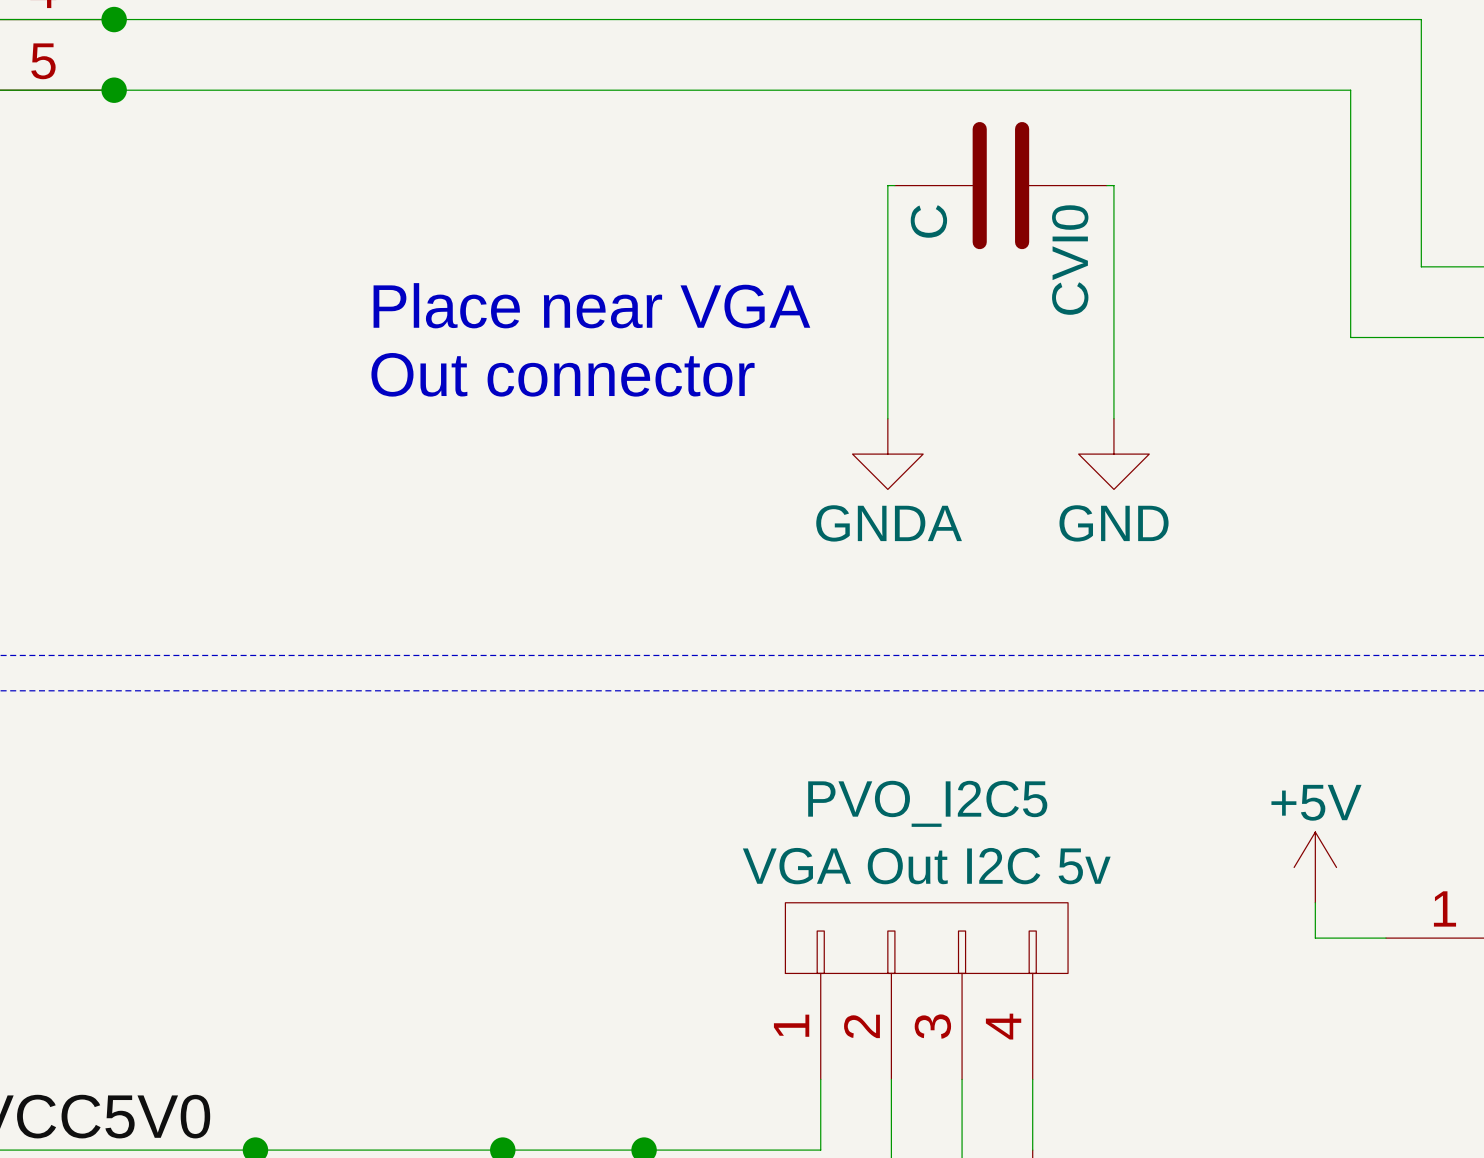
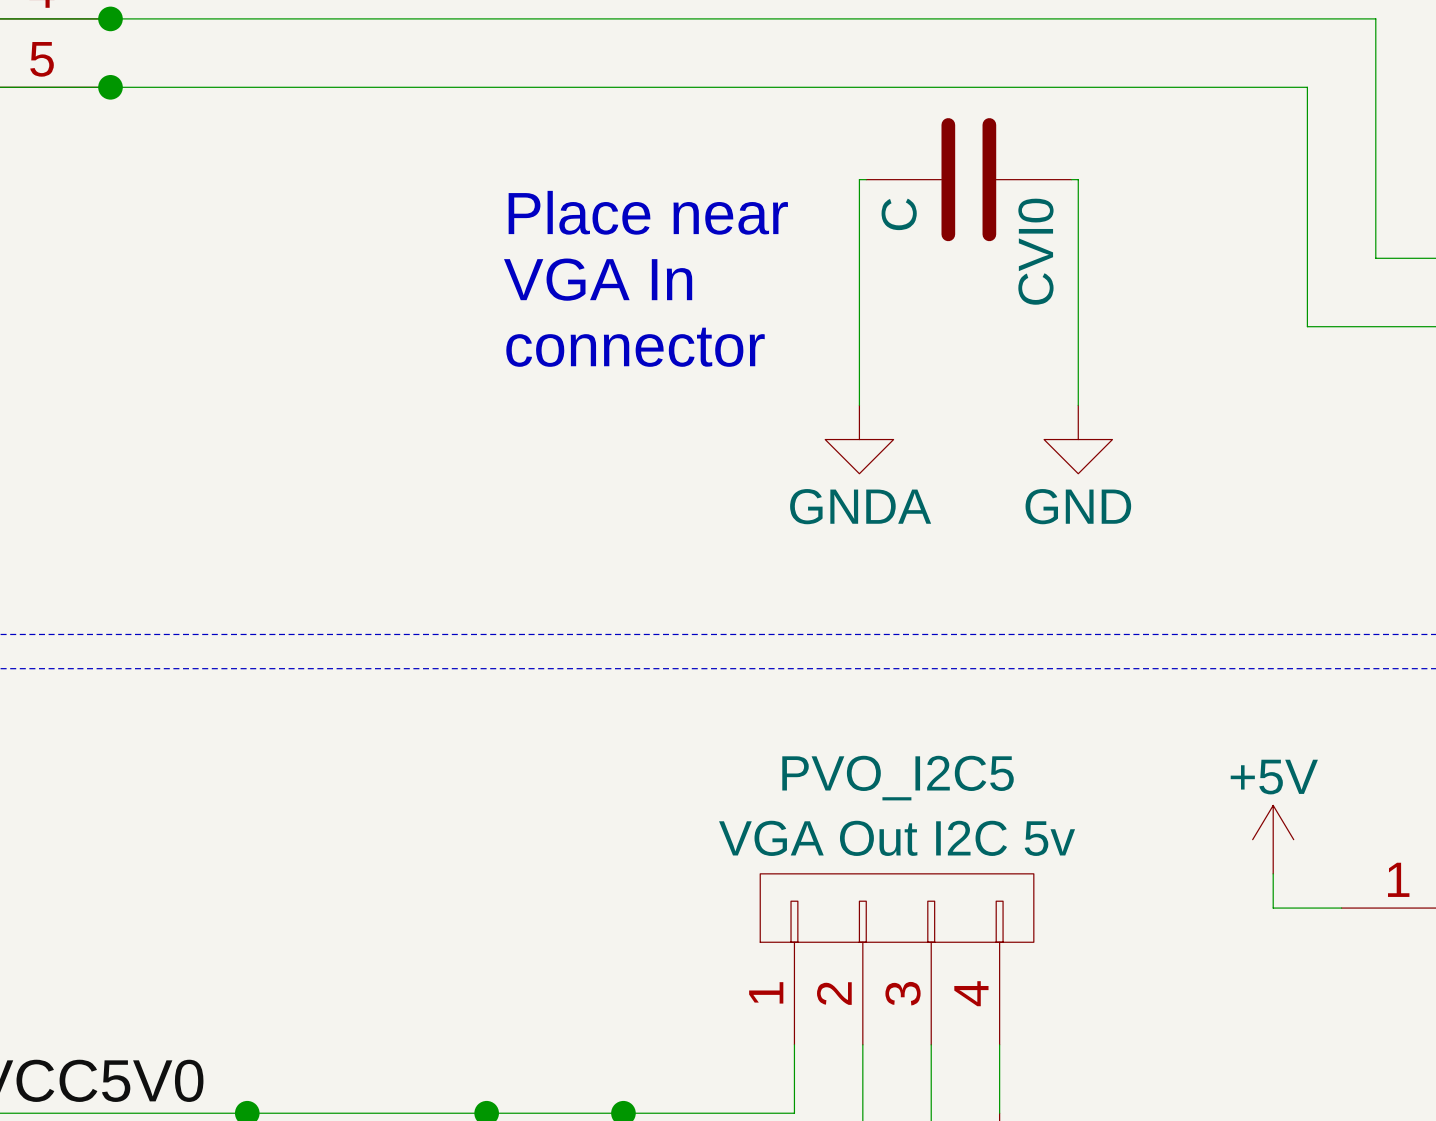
text: none -> VGA In (598, 279)
text: Place near VGA (591, 305) -> Place near (648, 212)
text: Out connector (563, 374) -> connector (635, 347)

